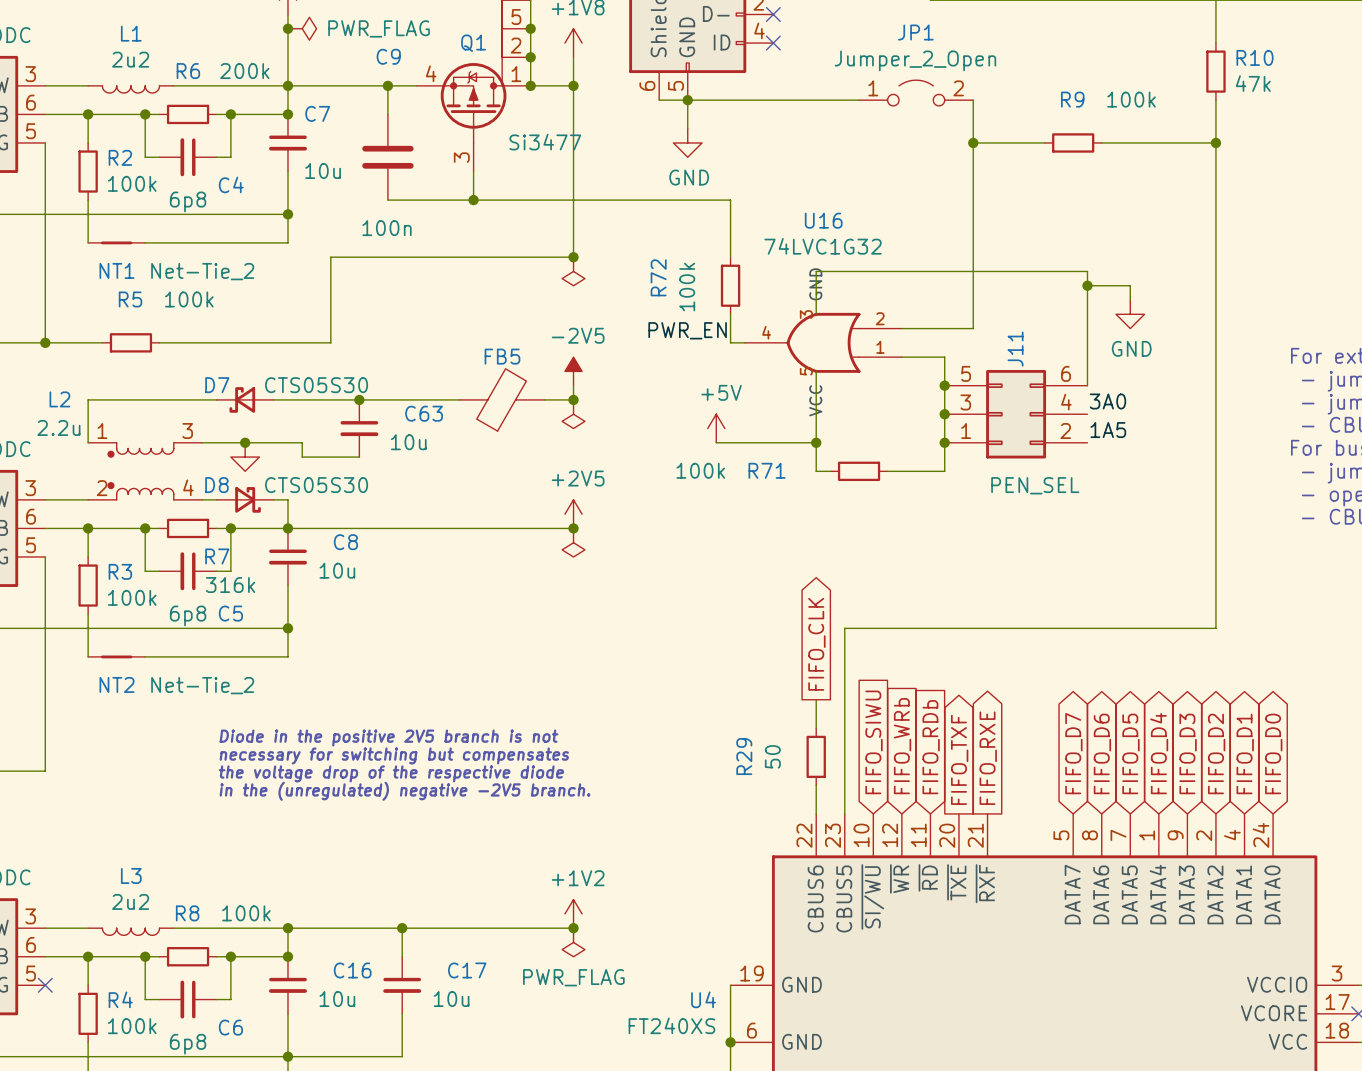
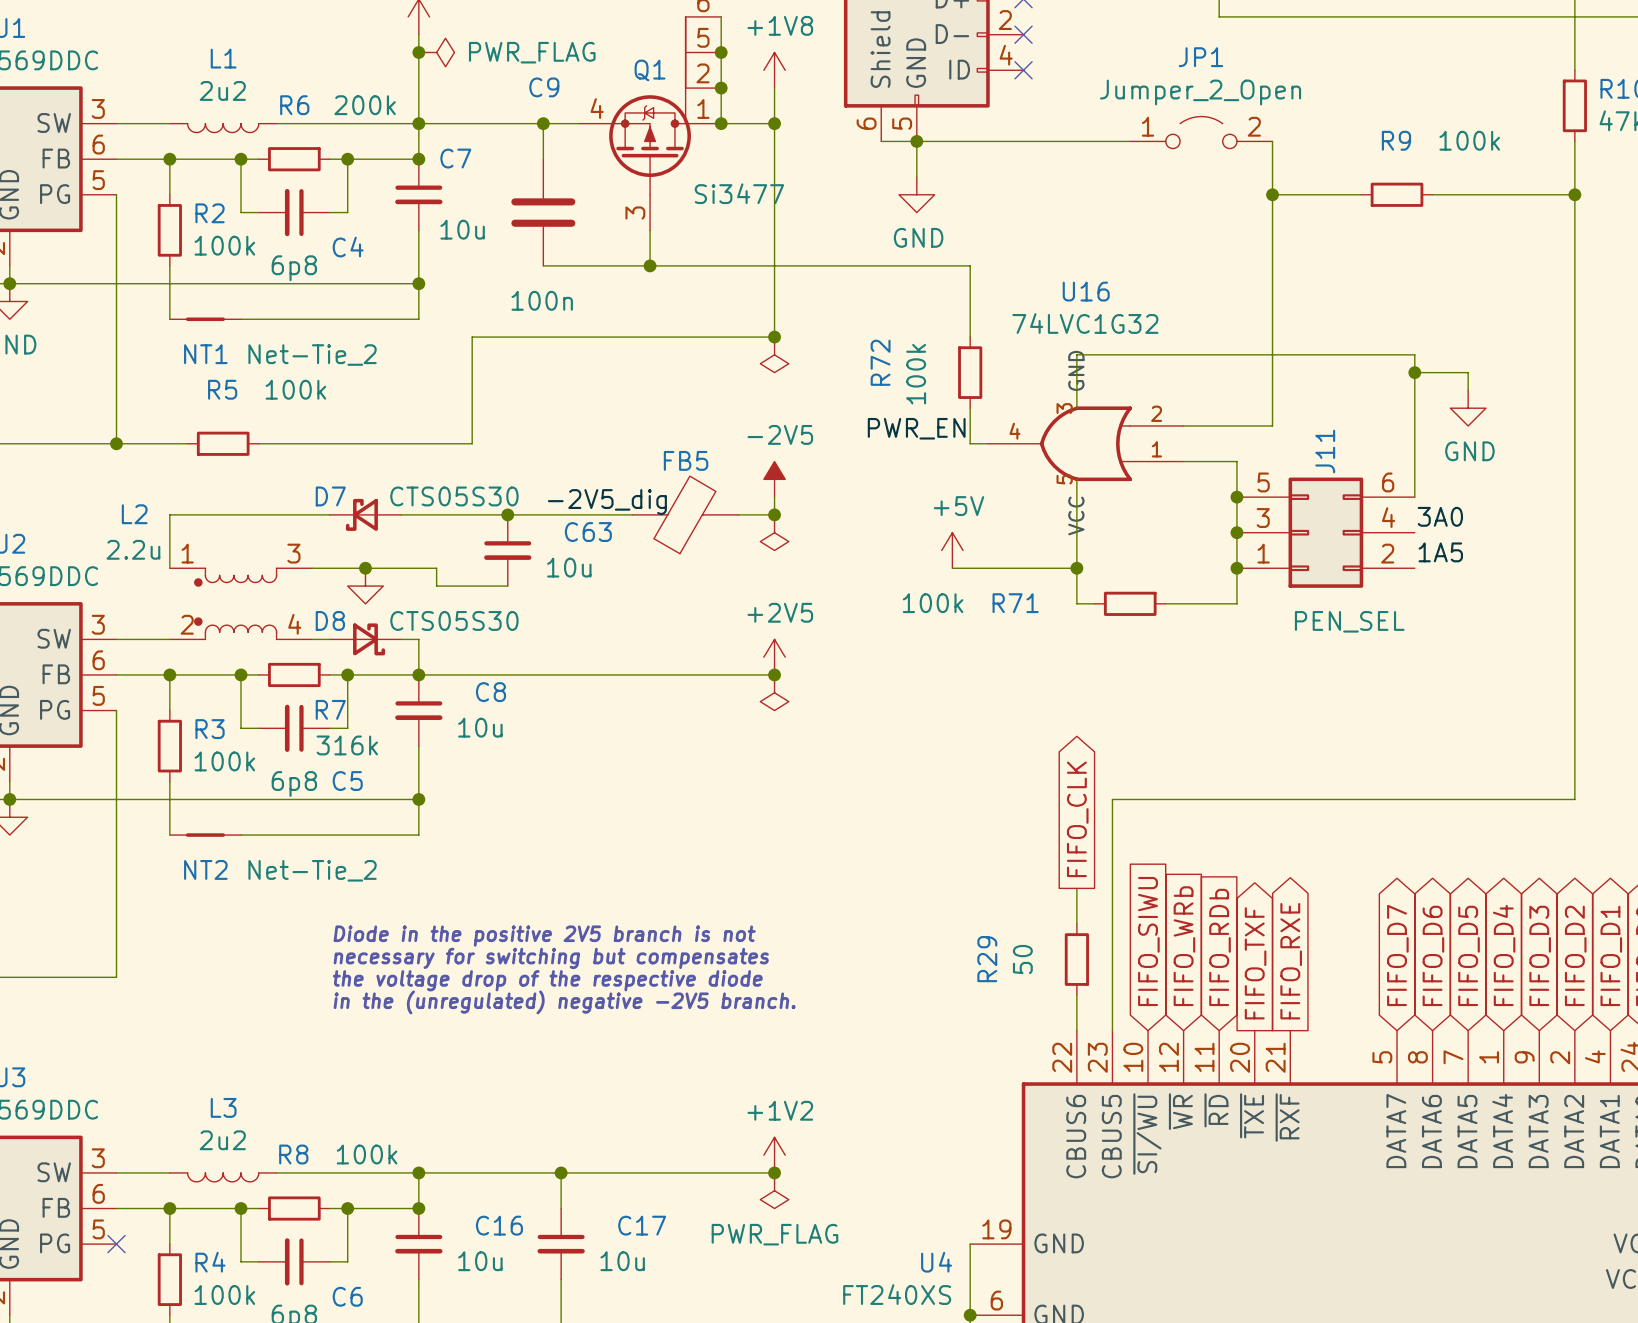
label: none -> -2V5_dig (607, 502)

